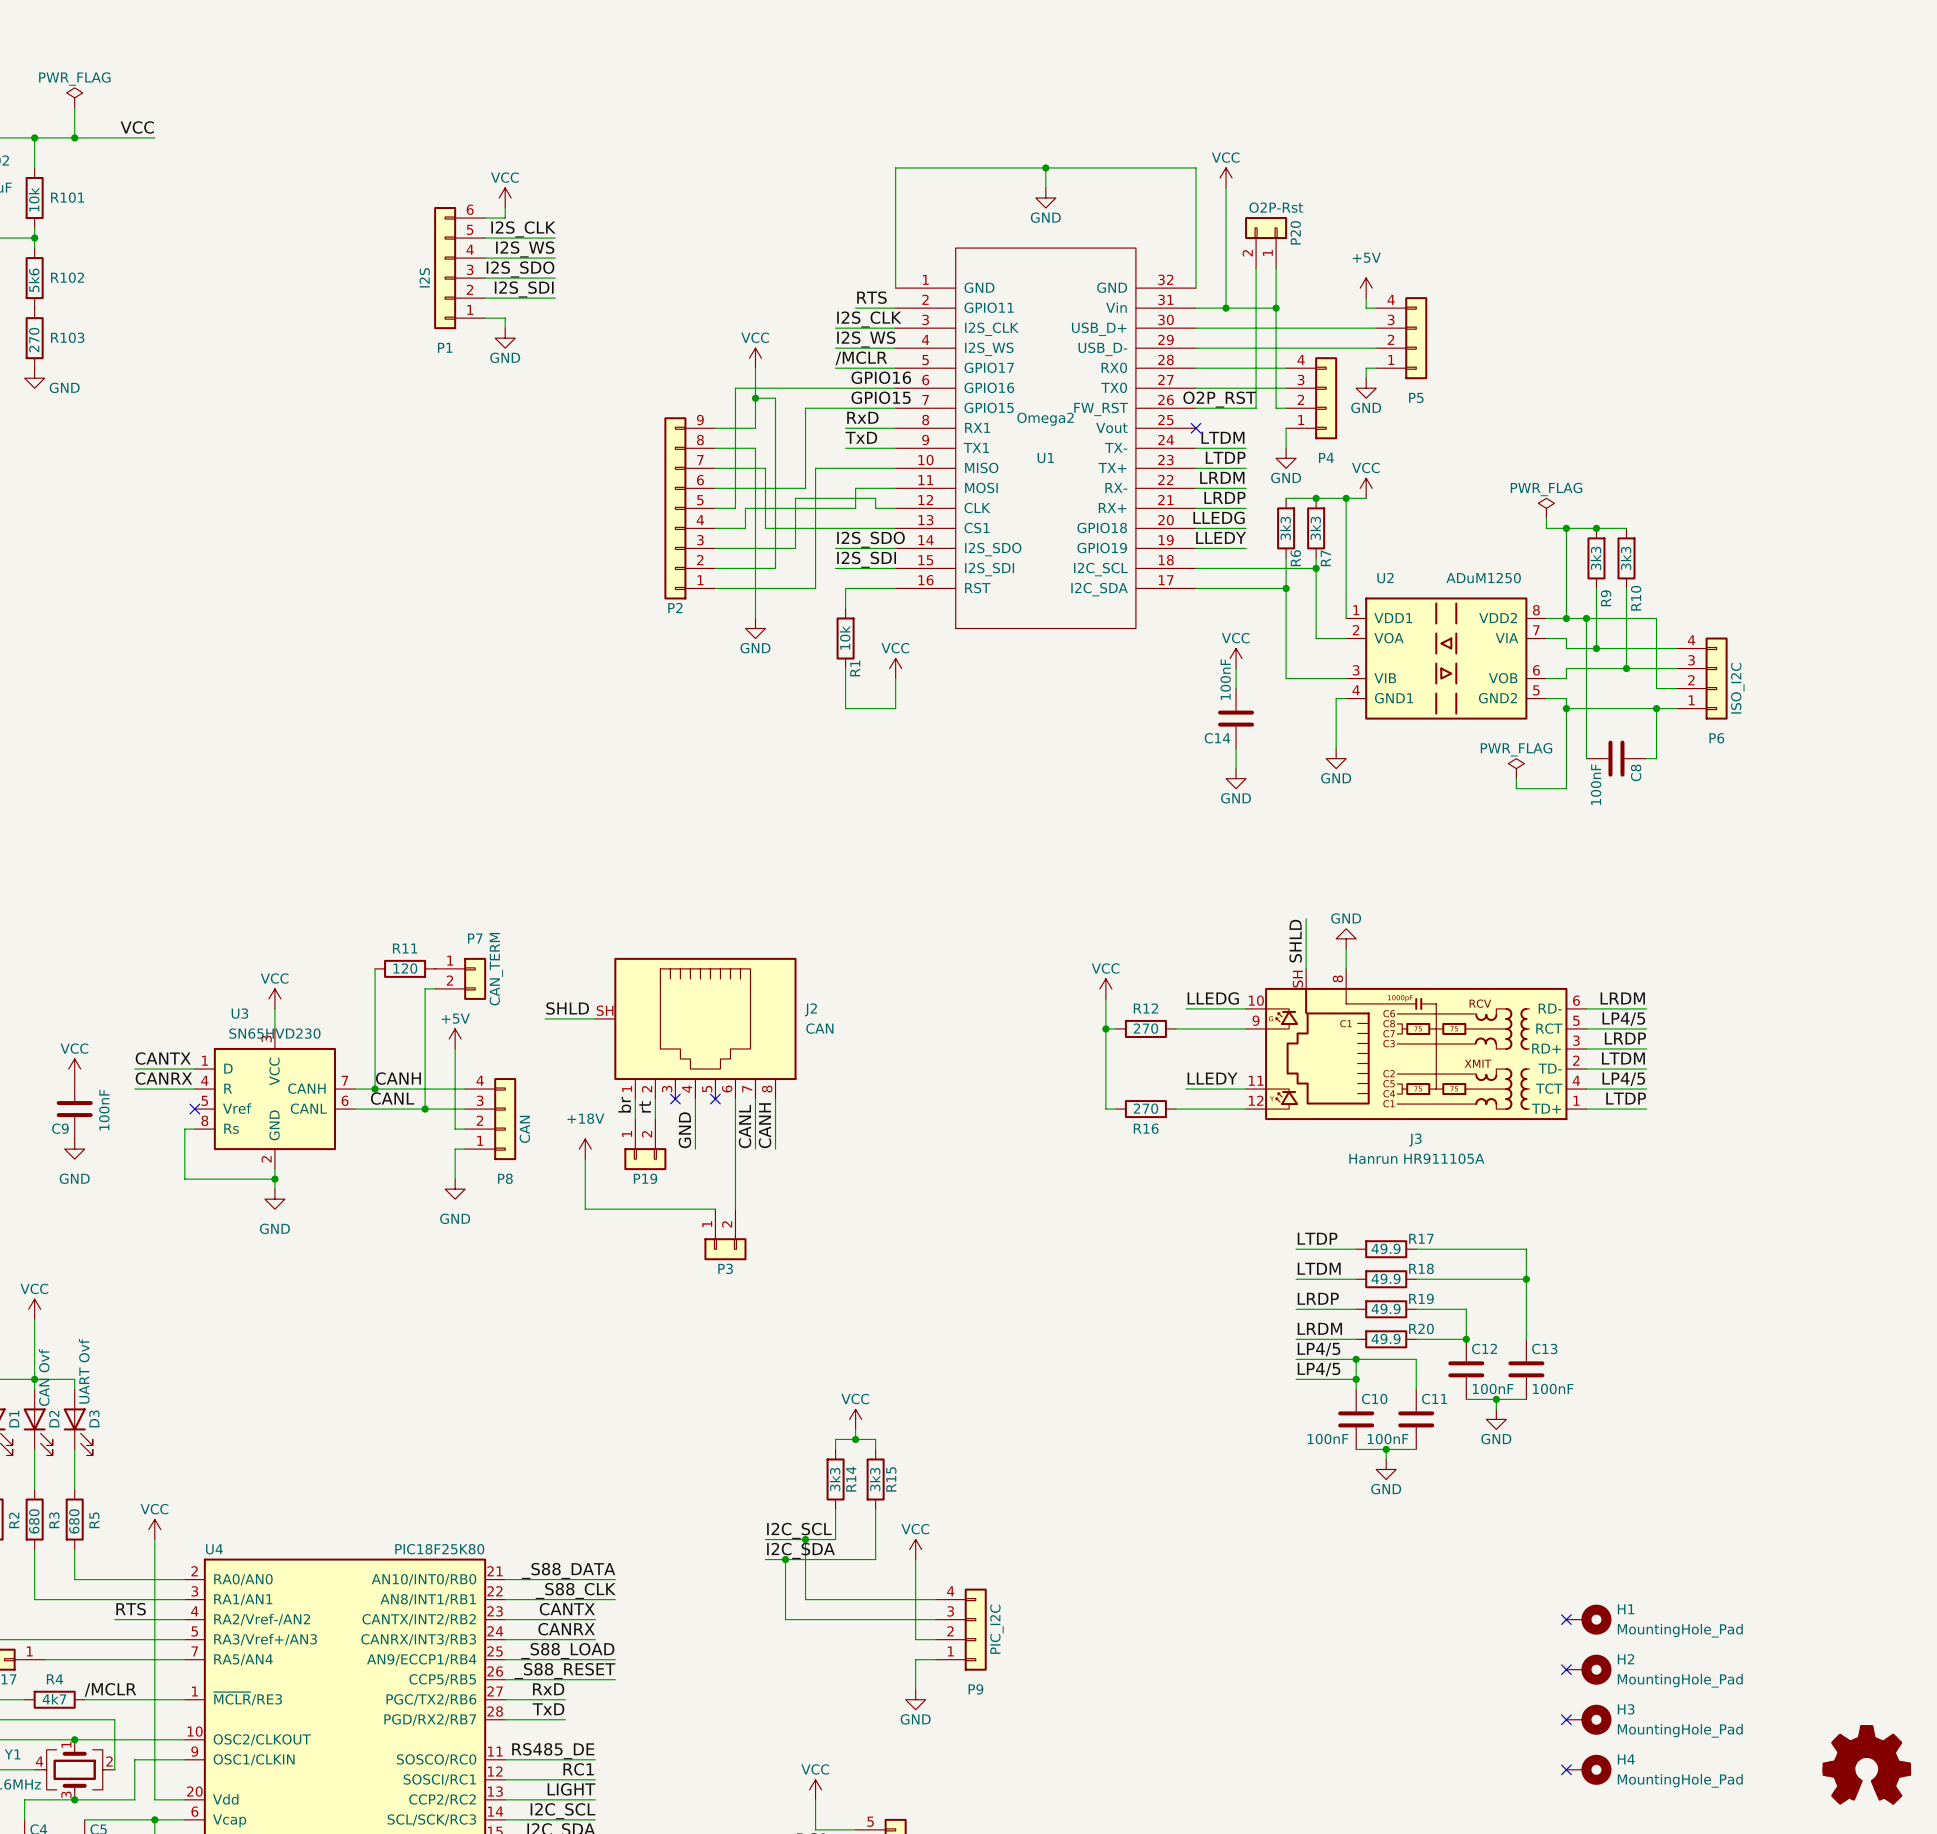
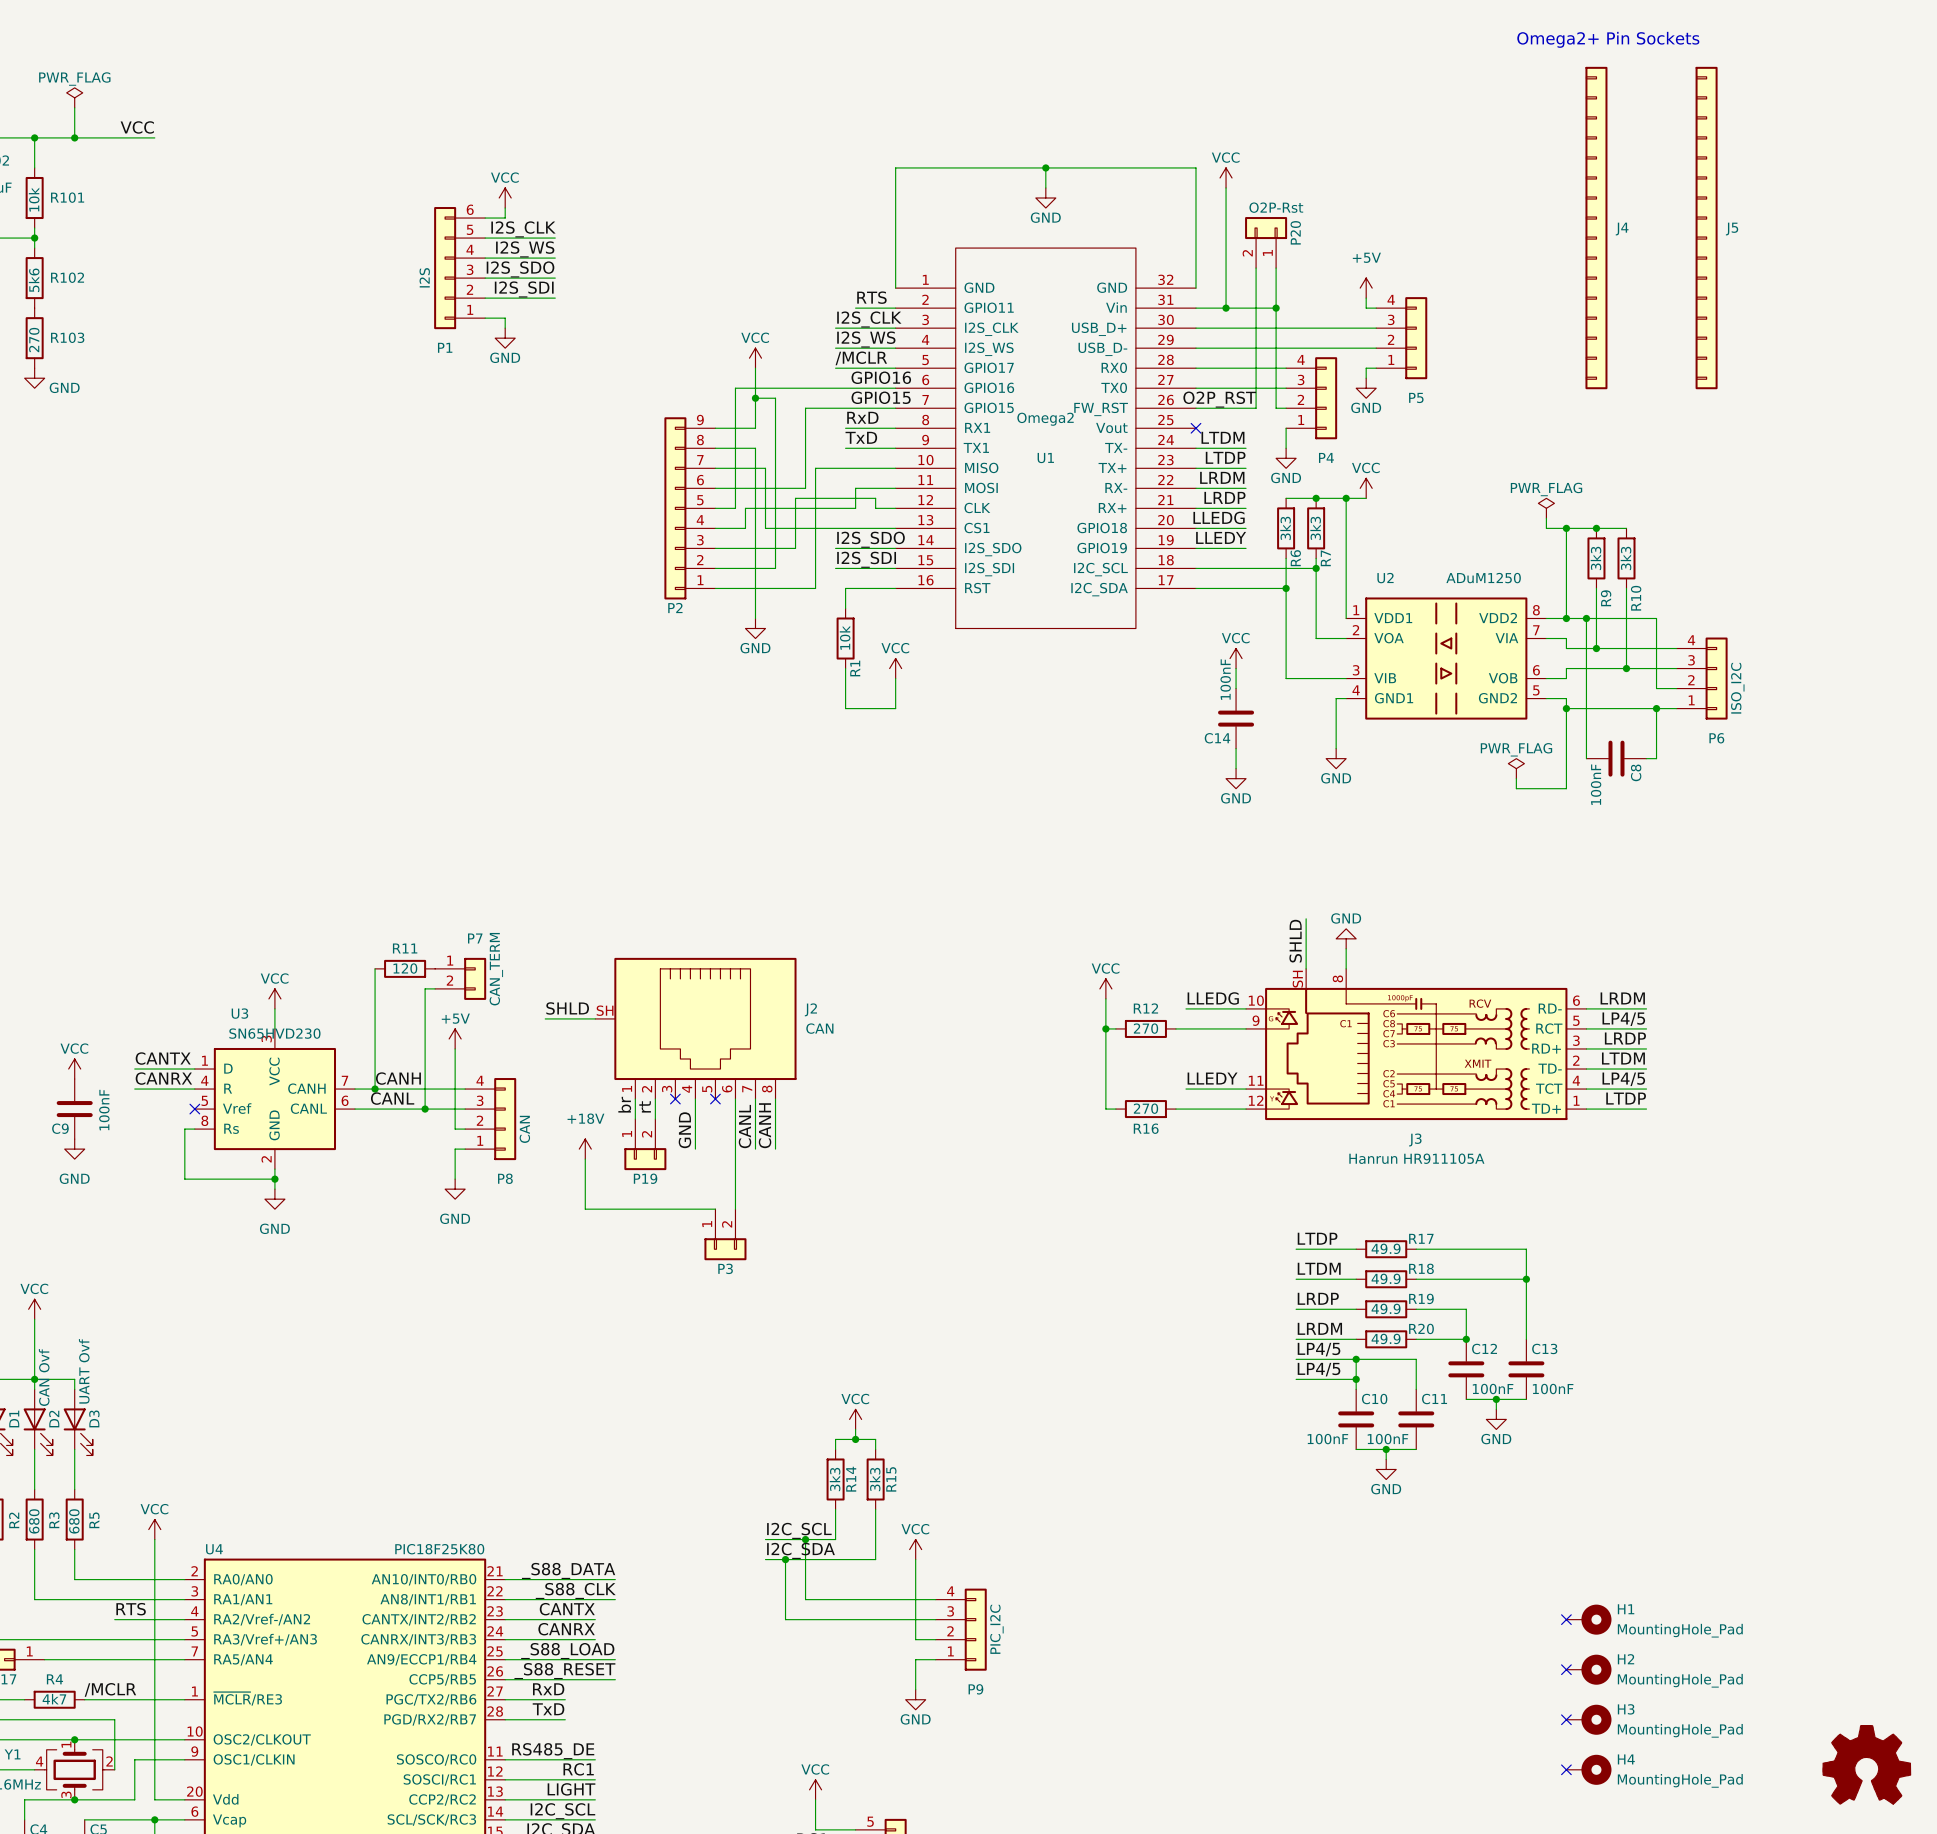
text: none -> Omega2+ Pin Sockets (1608, 39)
J4: none -> (1596, 228)
J5: none -> (1706, 228)

